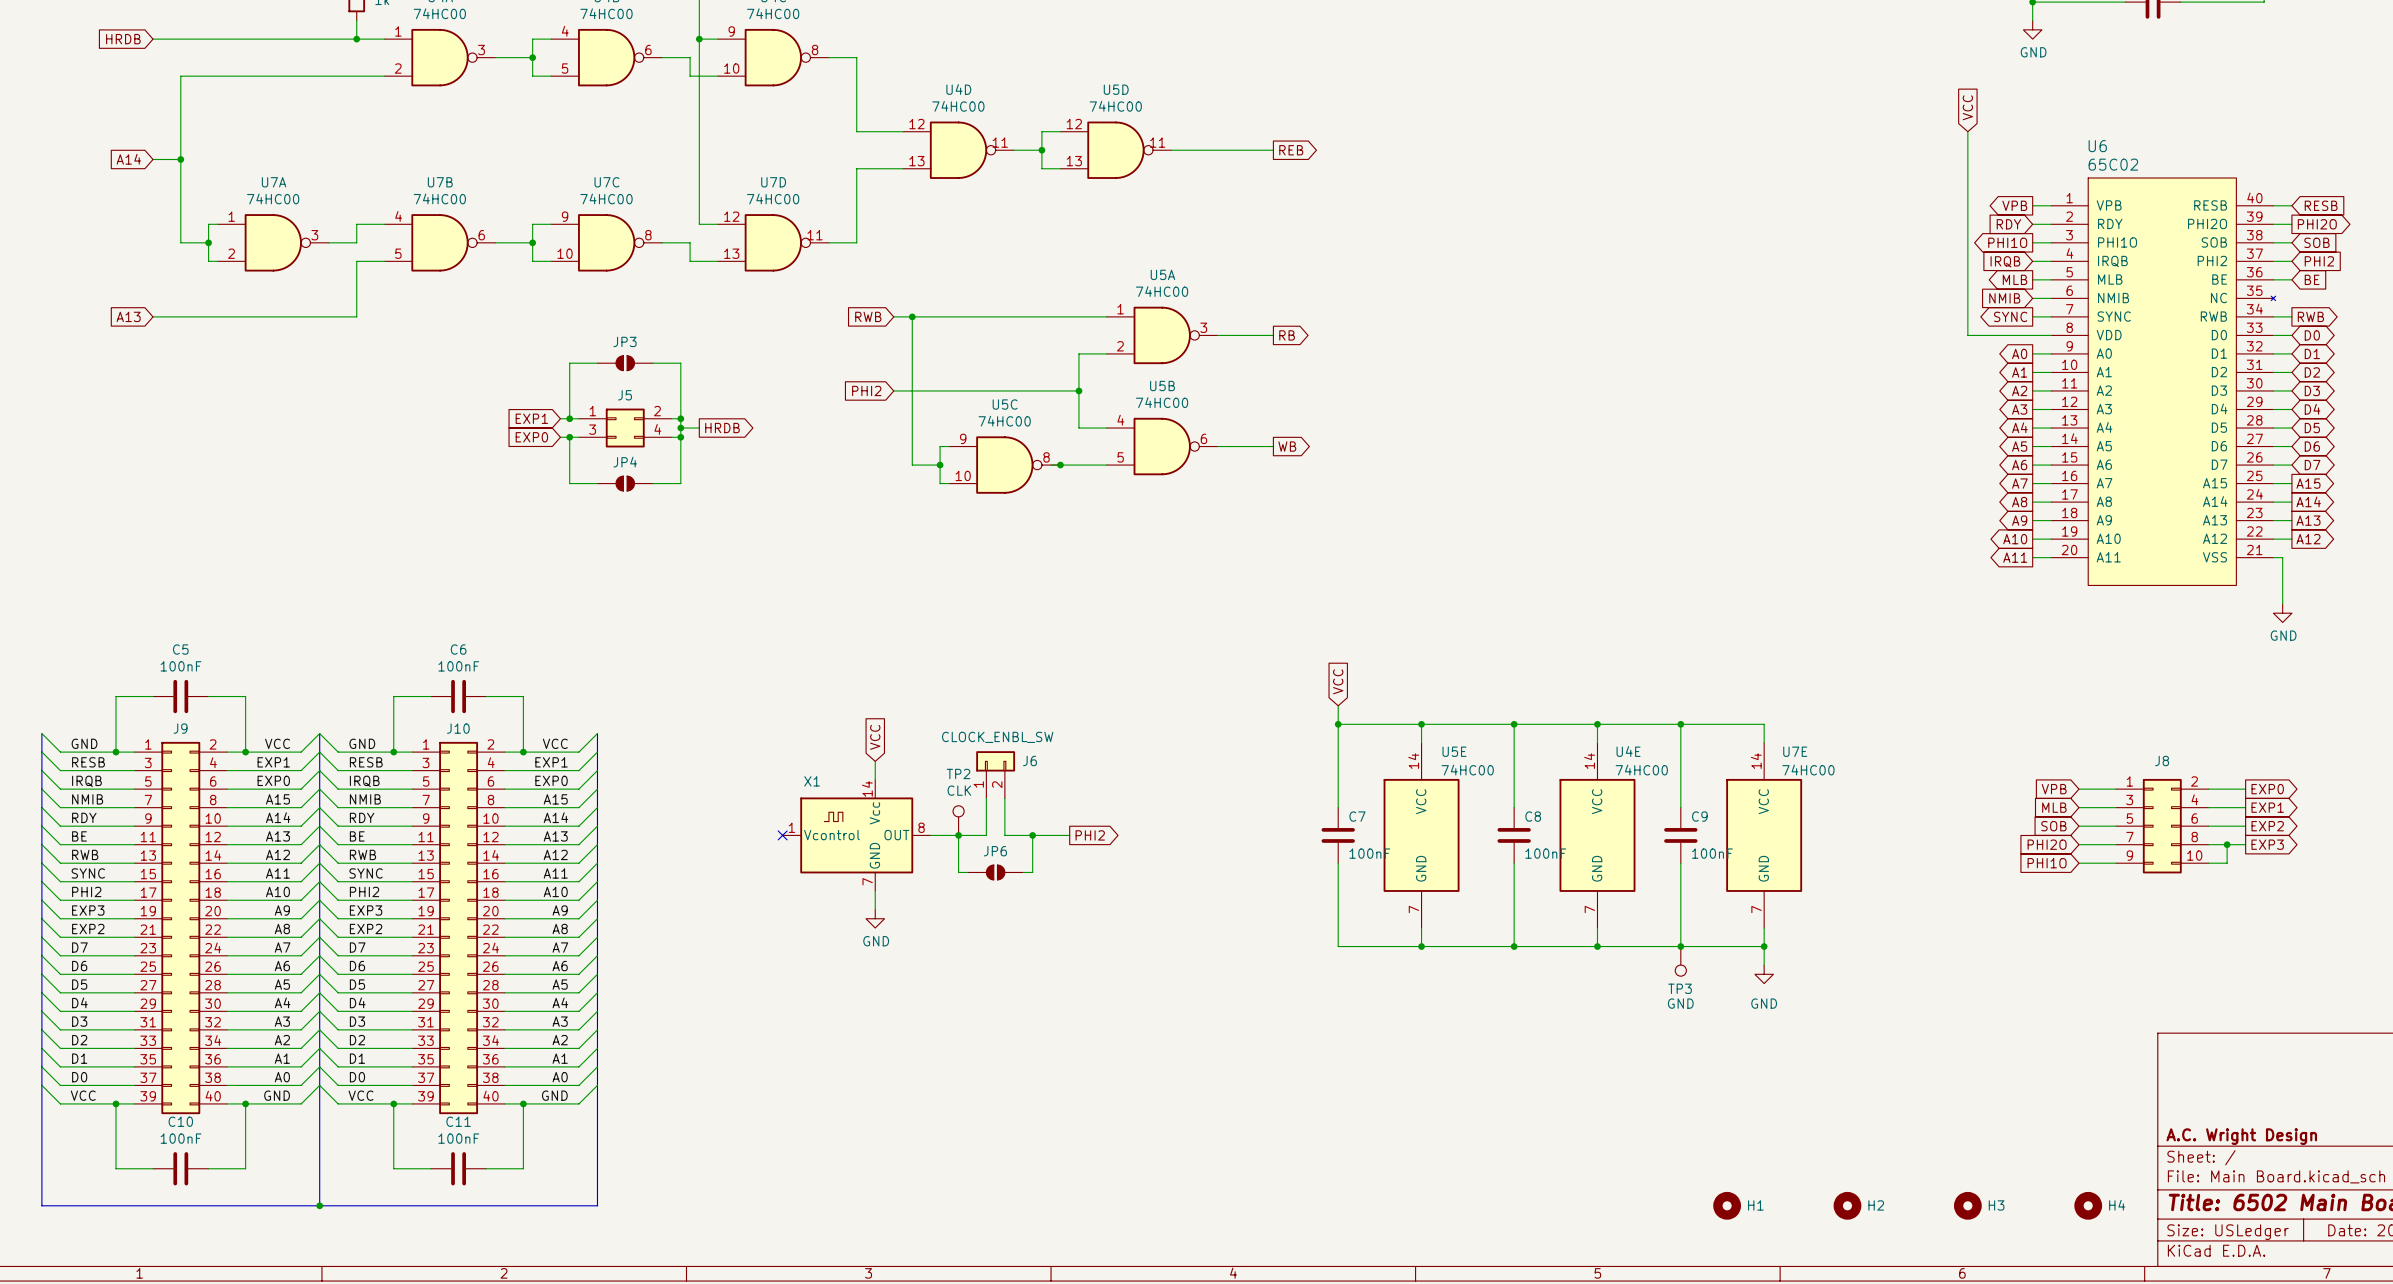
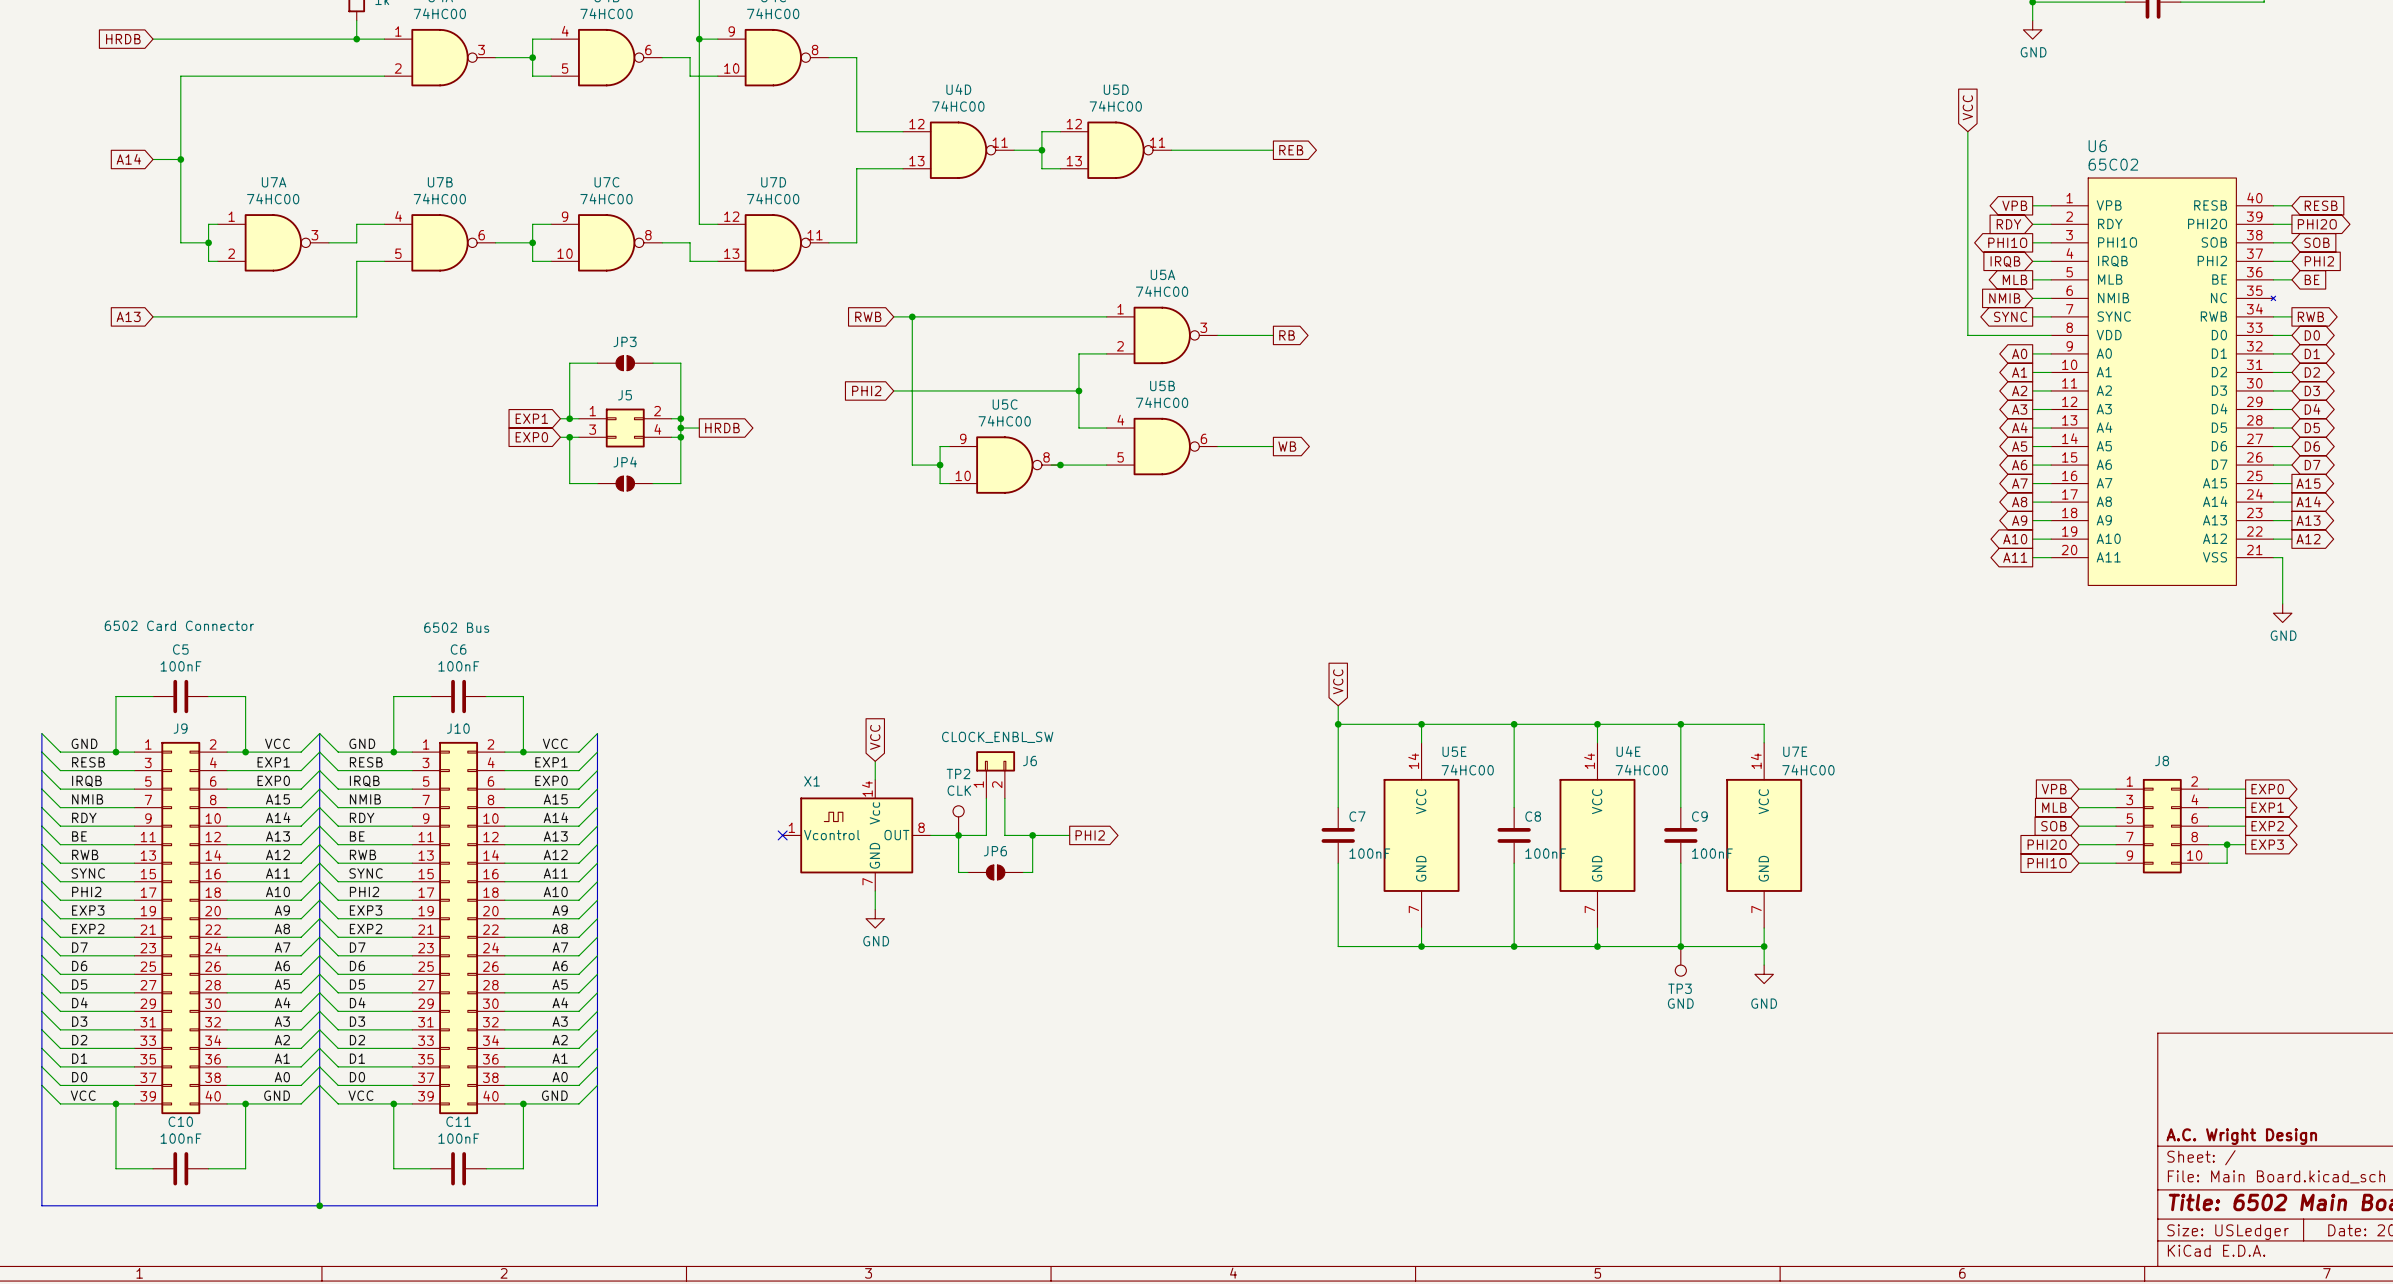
J9 value: none -> 6502 Card Connector (179, 625)
J10 value: none -> 6502 Bus (456, 627)
H1: (1727, 1205) -> none
H2: (1847, 1205) -> none
H3: (1967, 1205) -> none
H4: (2088, 1205) -> none

